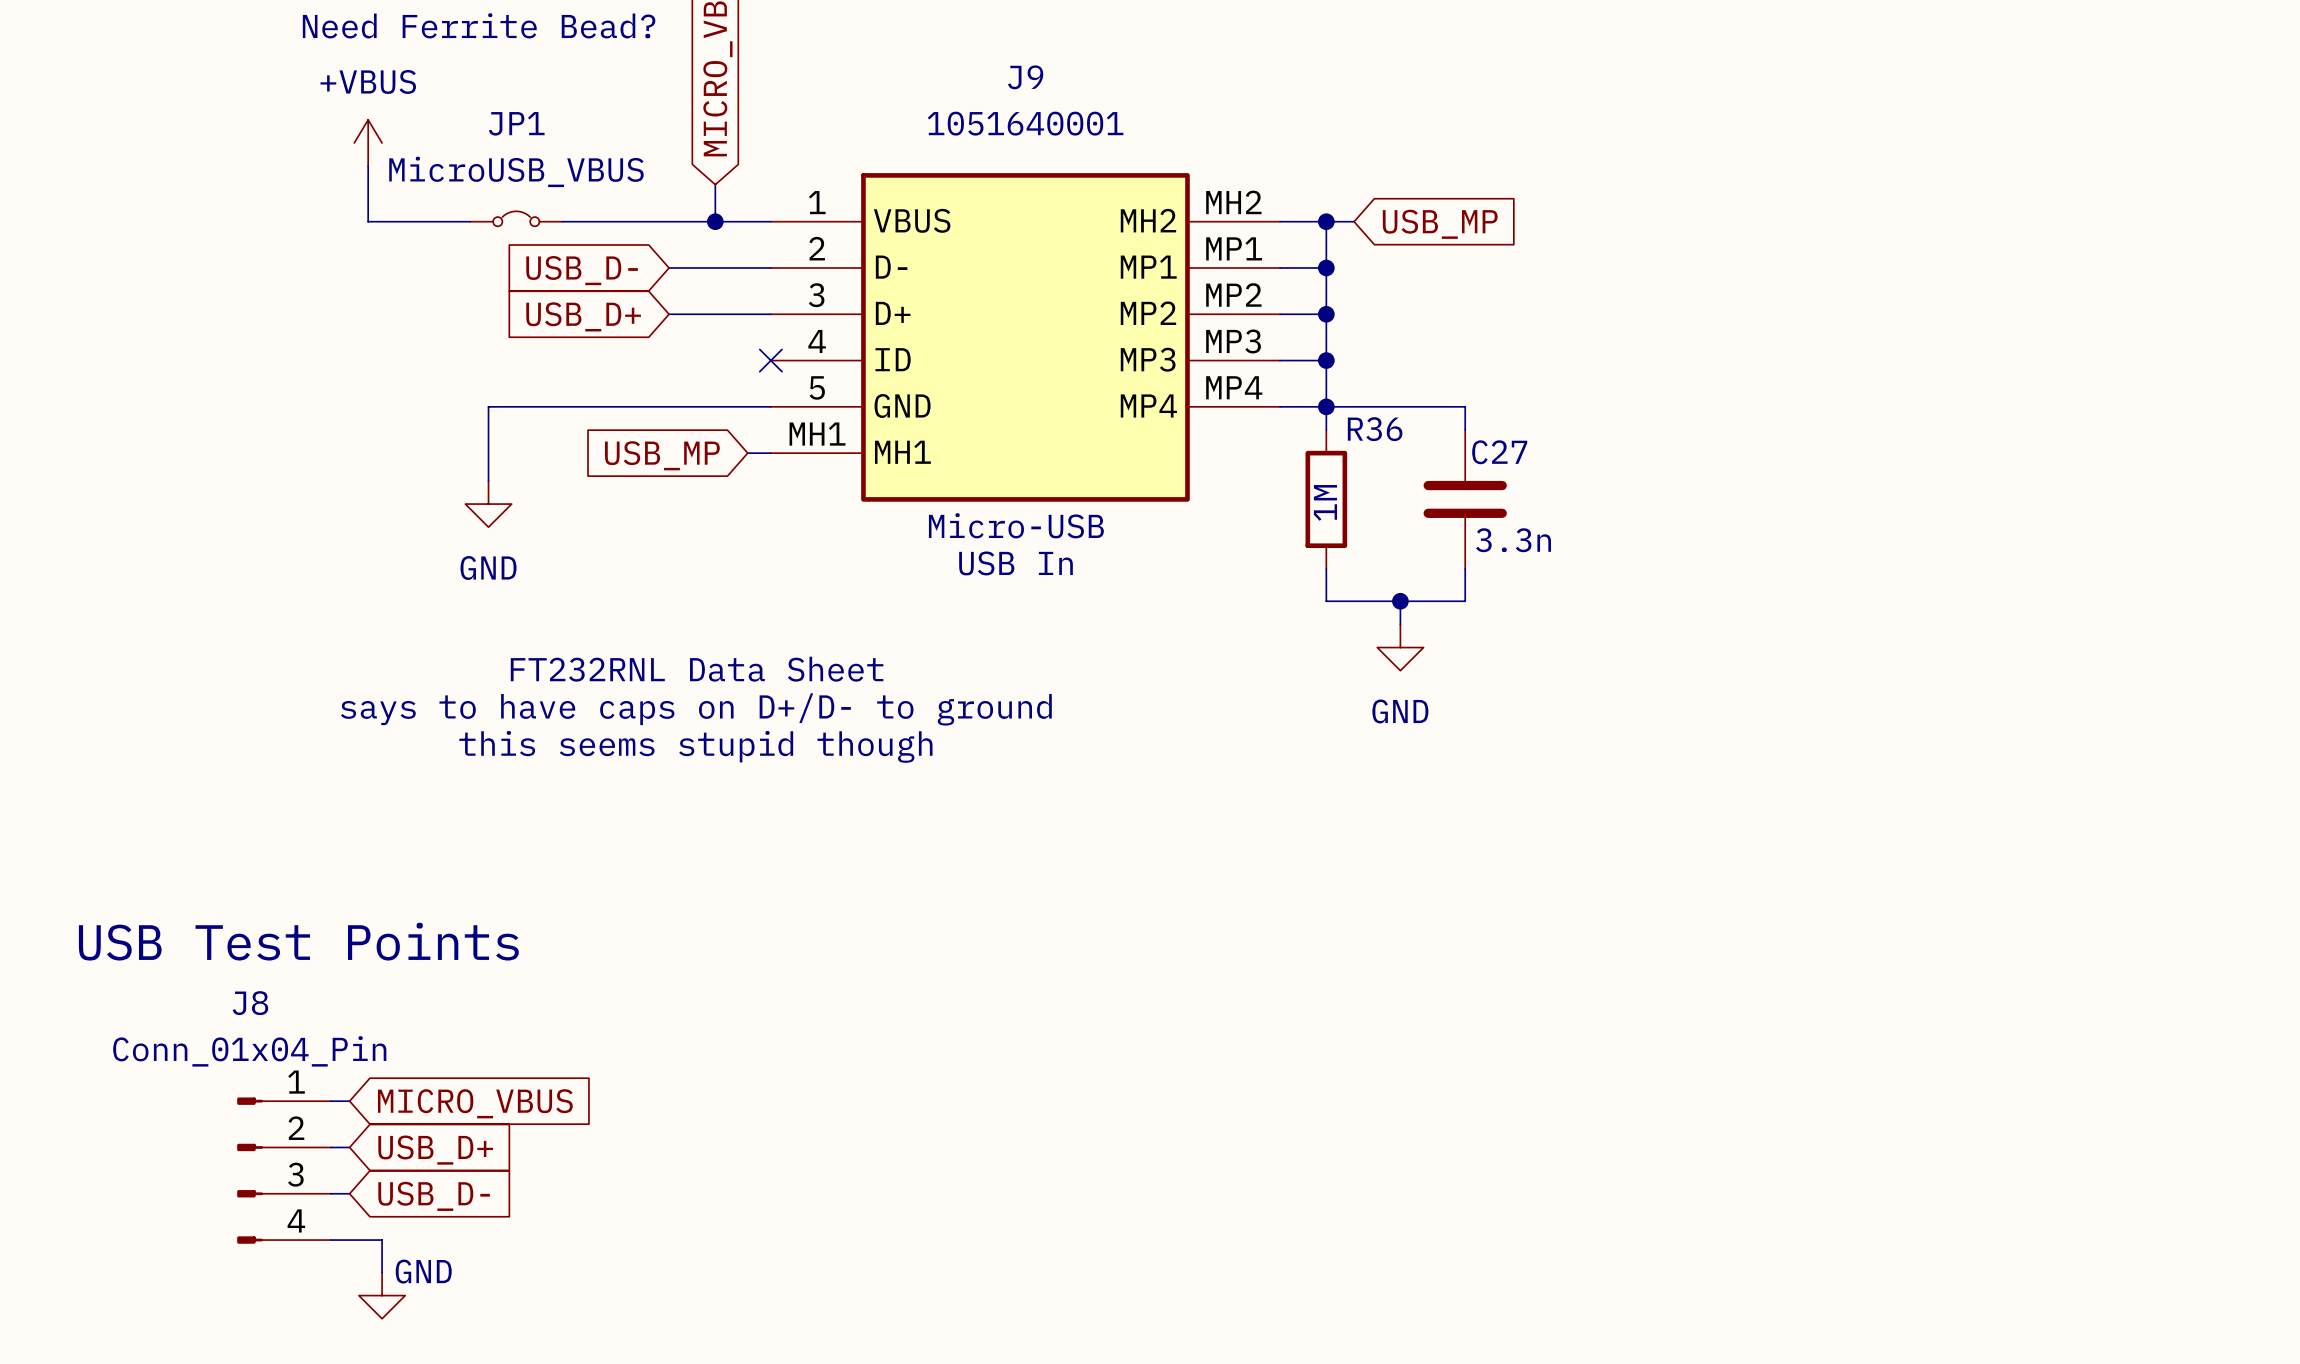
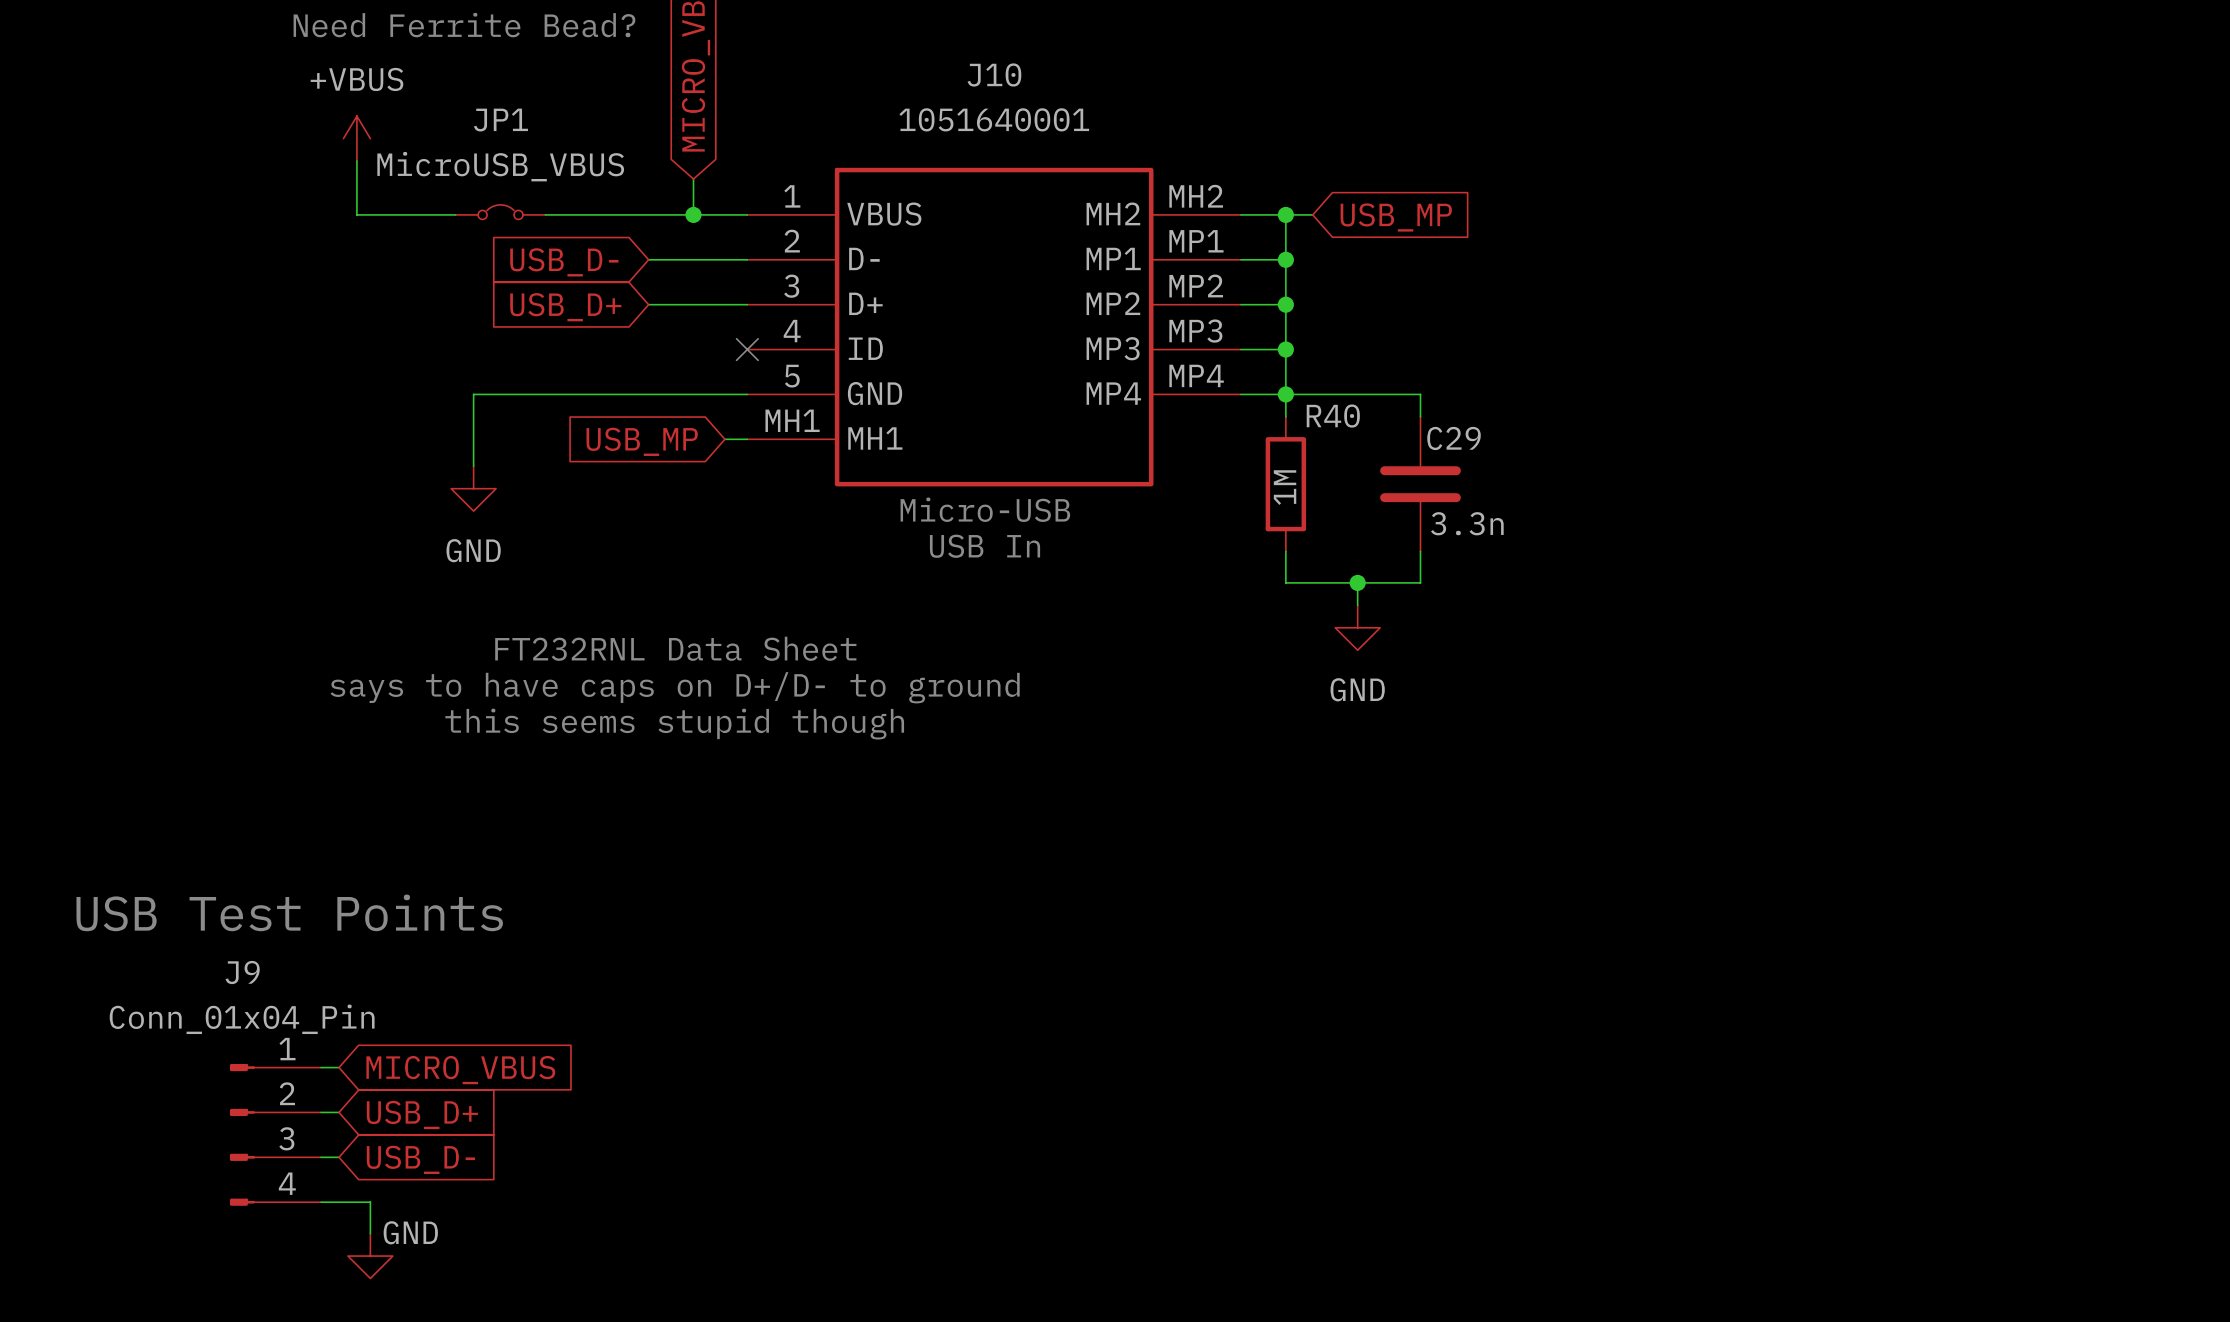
J9 name: J9 (1025, 77) -> J10 (994, 74)
R36 name: R36 (1375, 429) -> R40 (1333, 416)
C27 name: C27 (1499, 452) -> C29 (1454, 438)
J8 name: J8 (250, 1003) -> J9 (242, 972)

